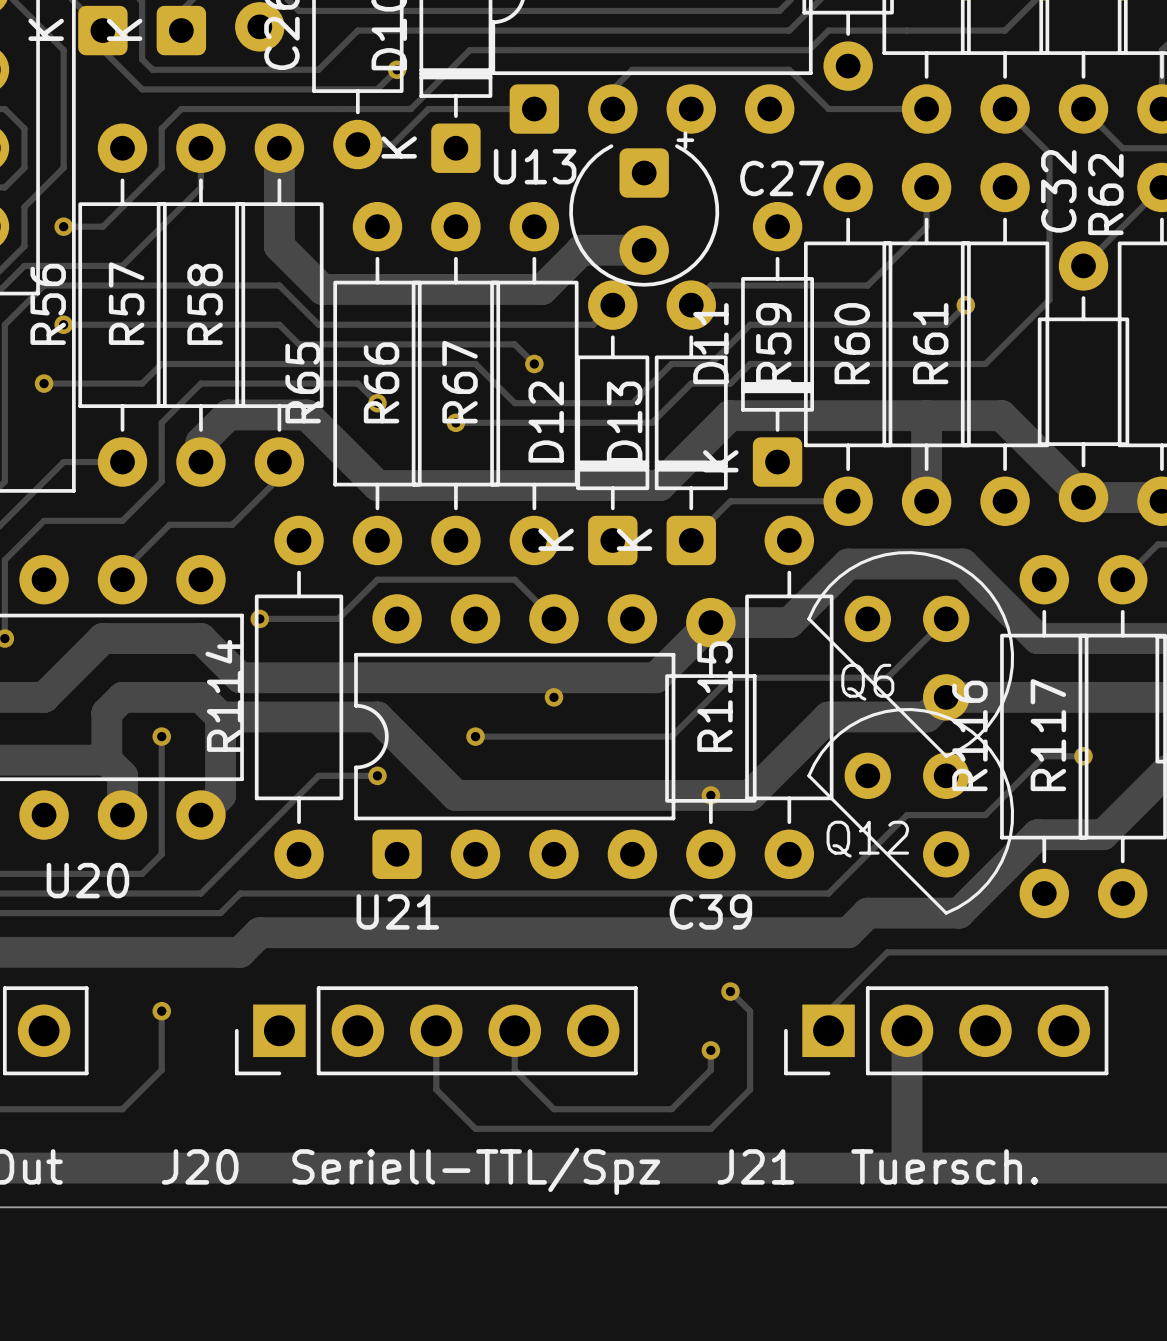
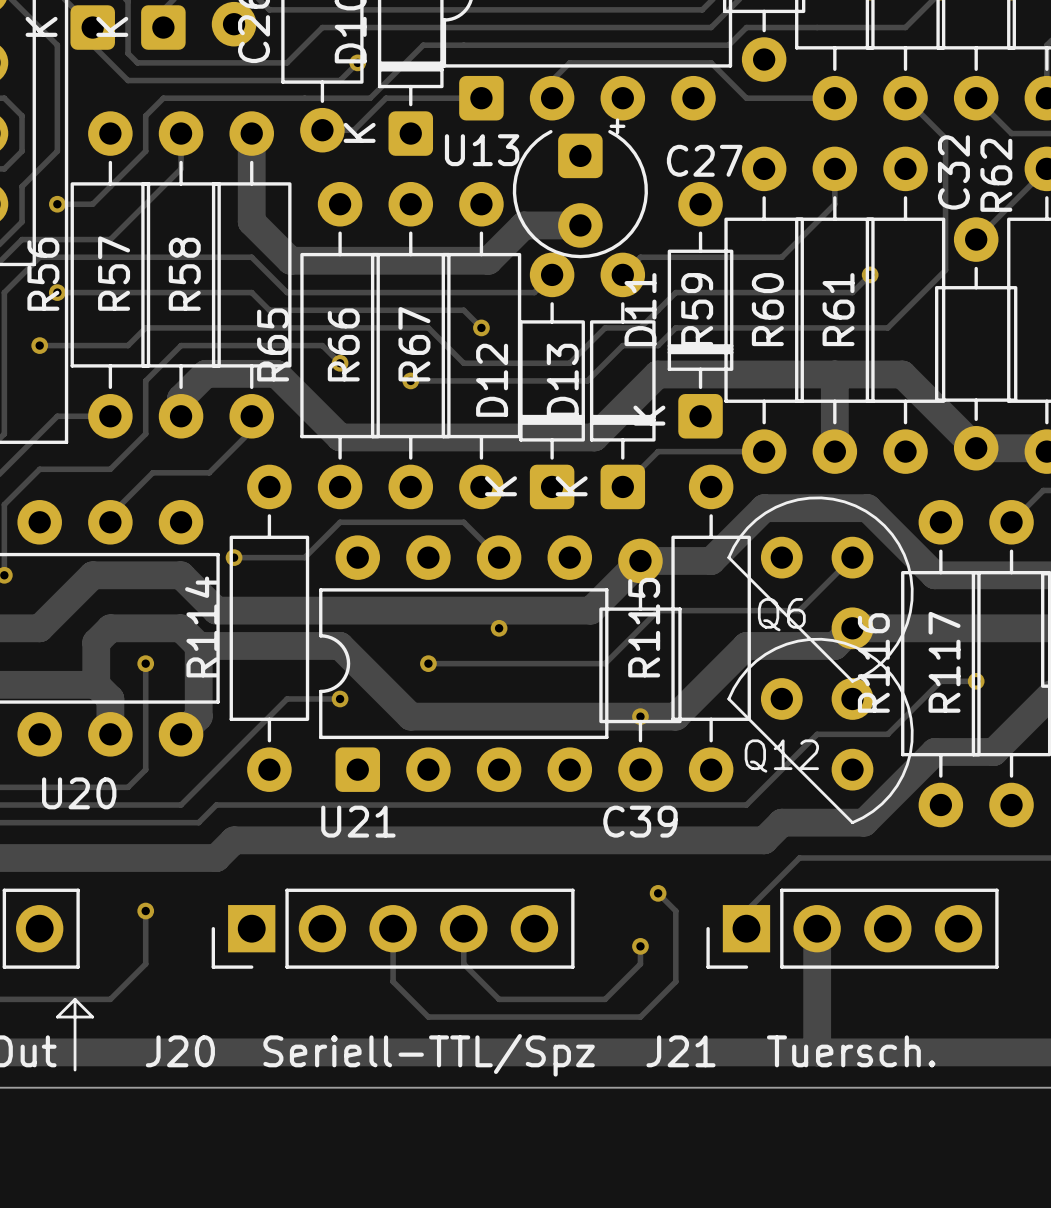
line: none -> (75, 999) (75, 1070)
line: none -> (75, 999) (57, 1017) (92, 1017) (75, 999)

